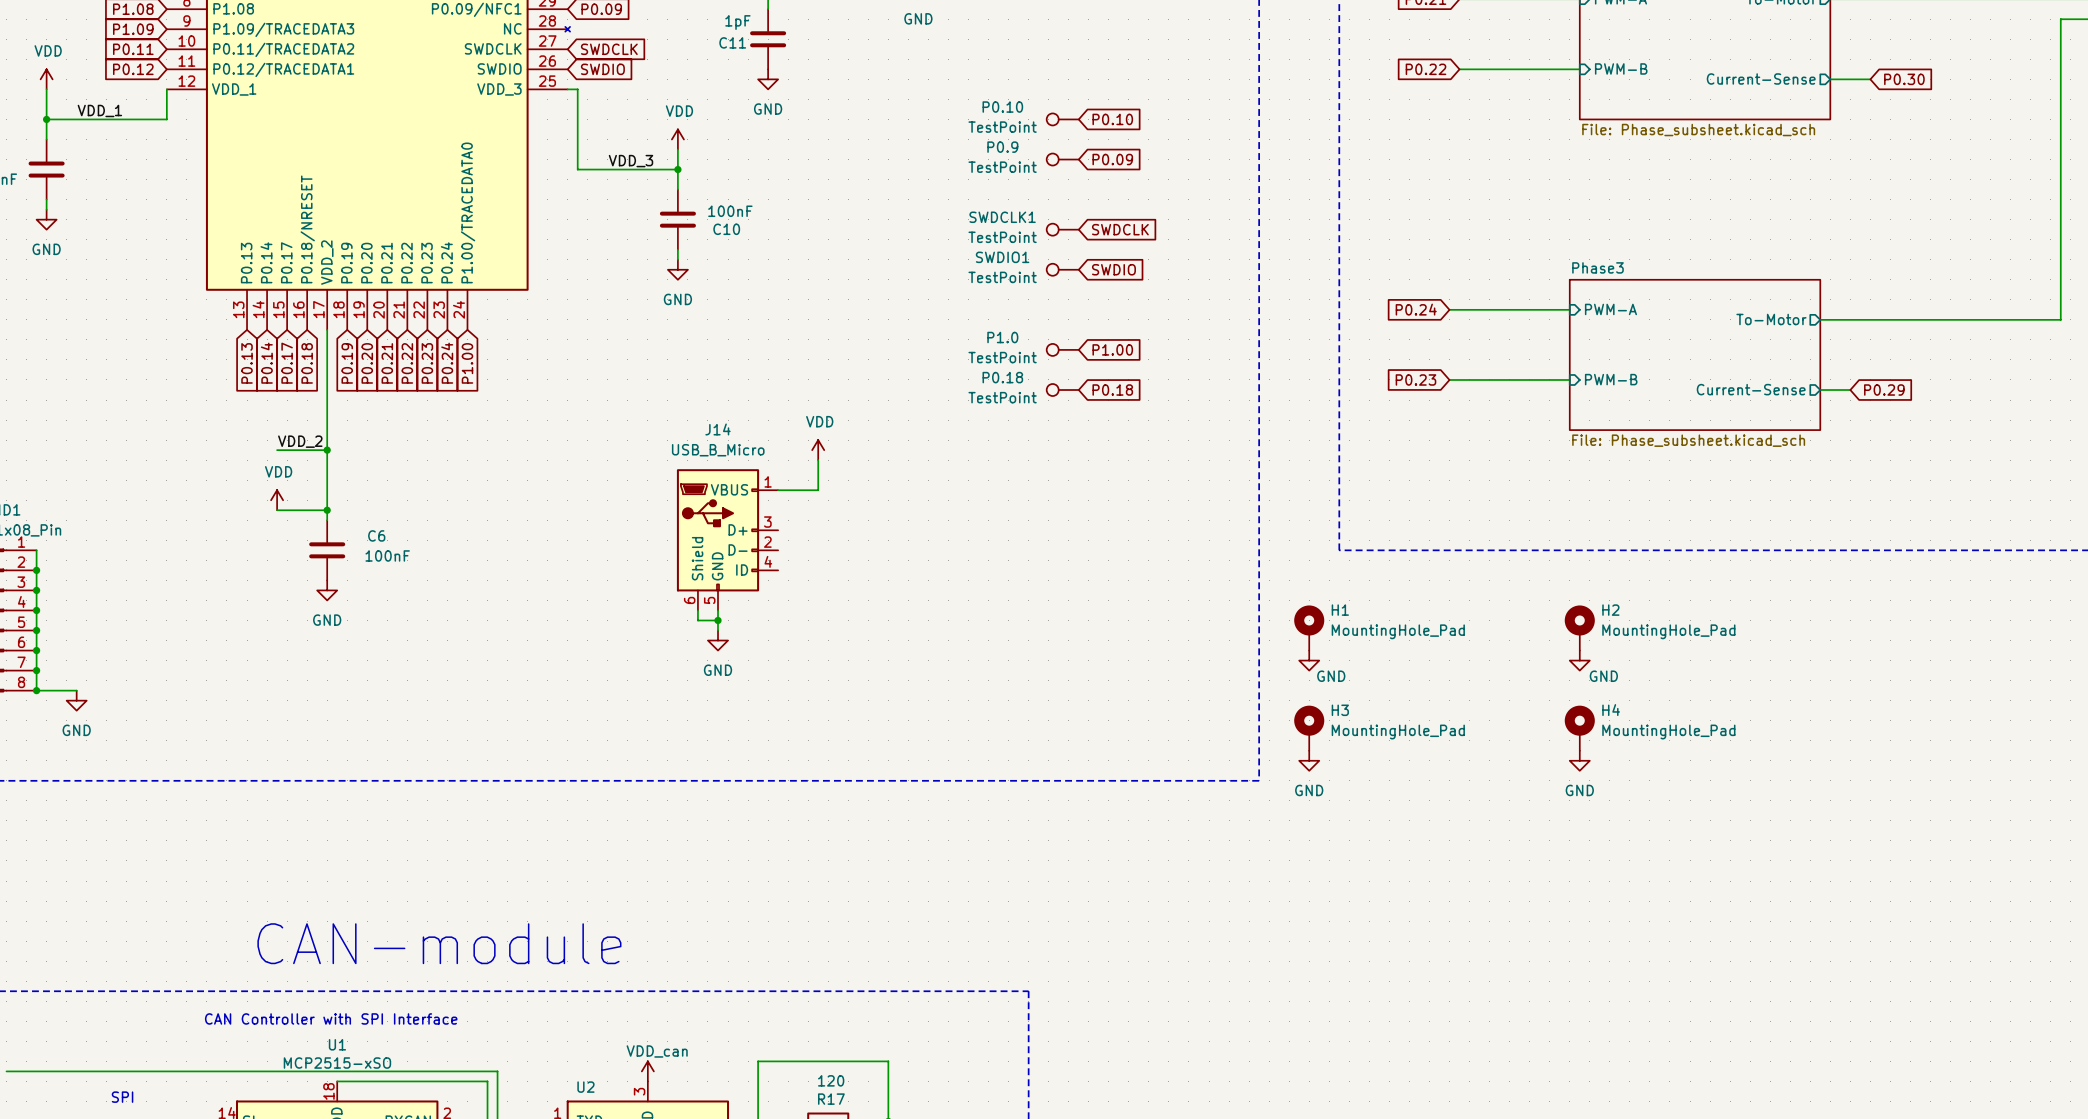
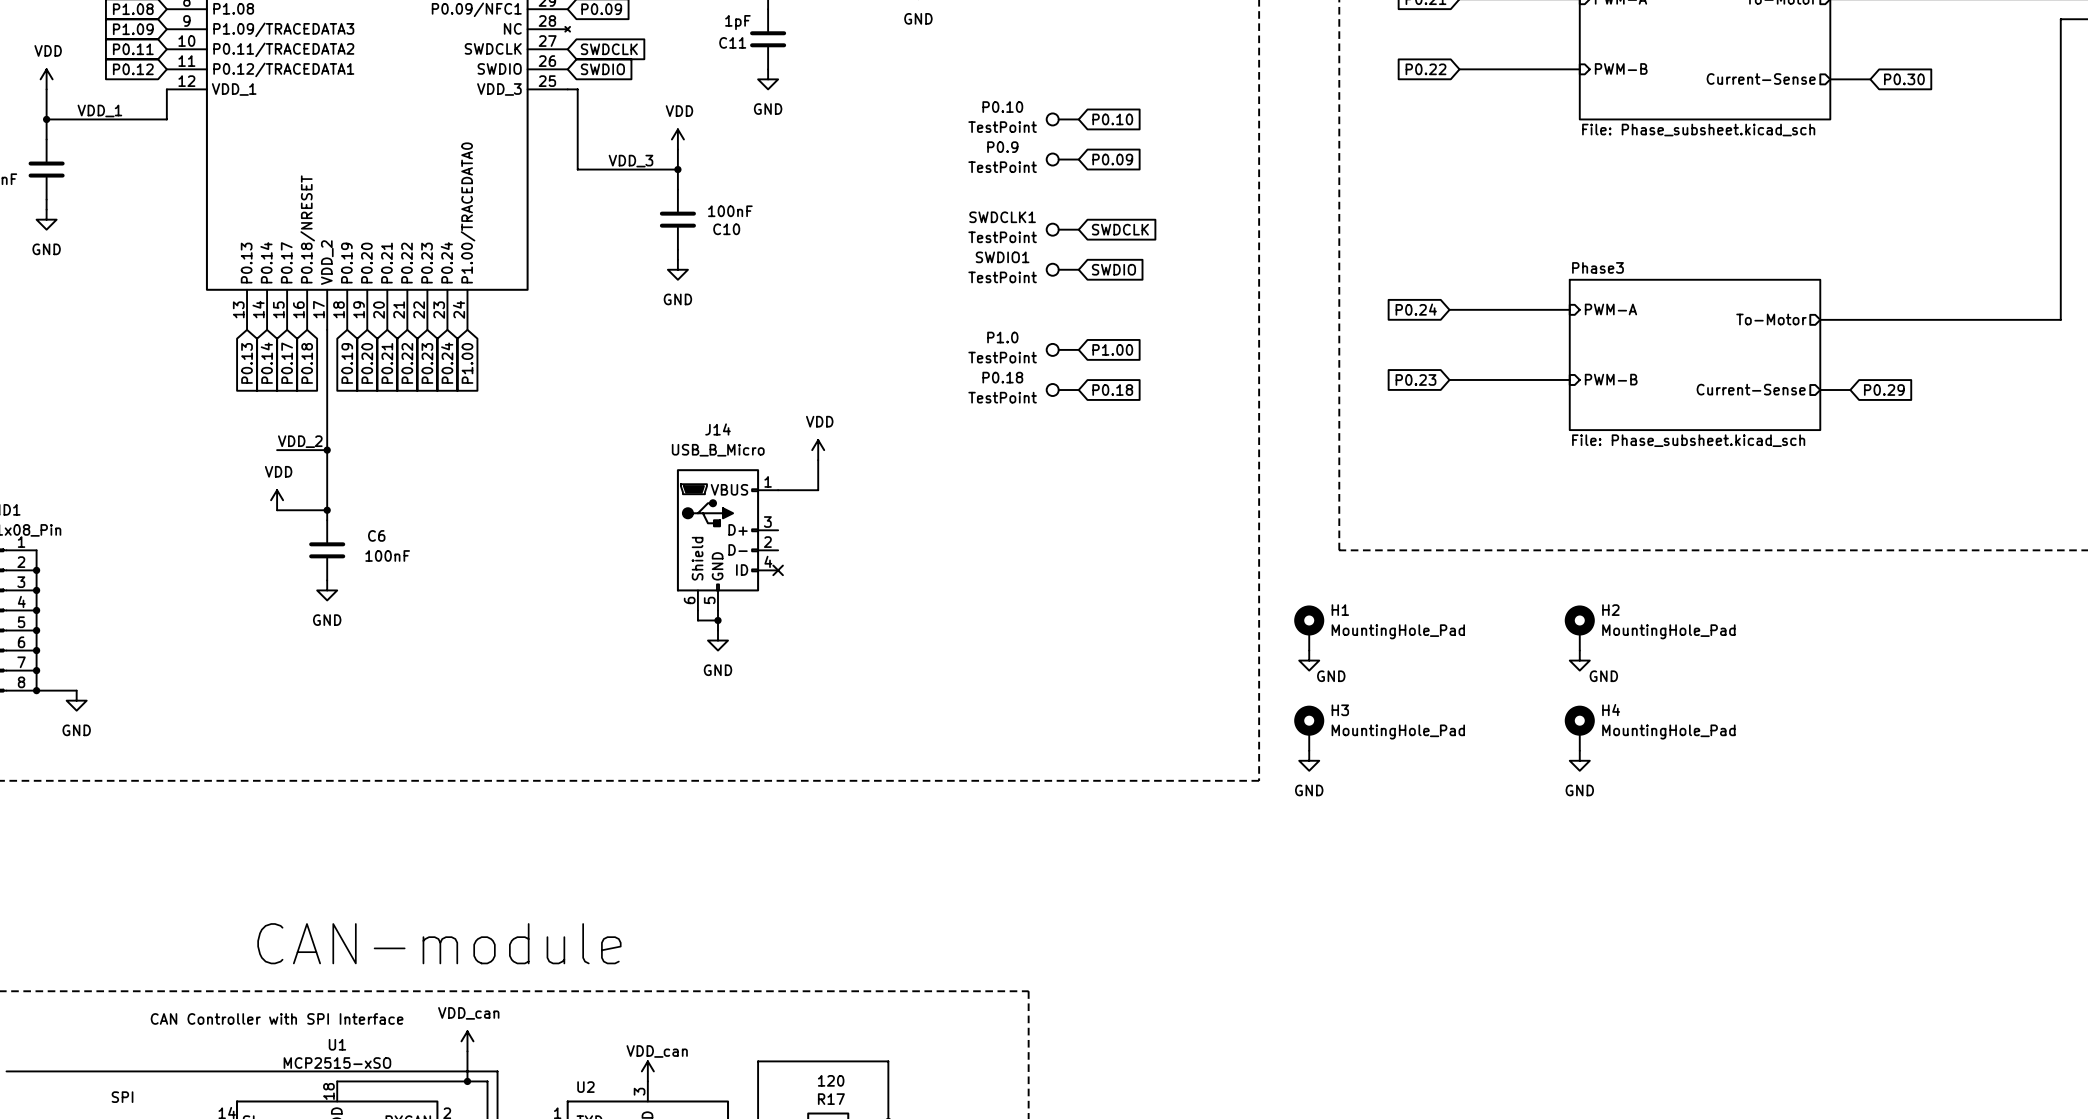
no-connect mark: none -> (778, 570)
text position: CAN Controller with SPI Interface (331, 1018) -> CAN Controller with SPI Interface (277, 1018)
power symbol: none -> VDD_can (467, 1041)
wire: none -> (467, 1051) (467, 1081)
junction: none -> (467, 1081)

